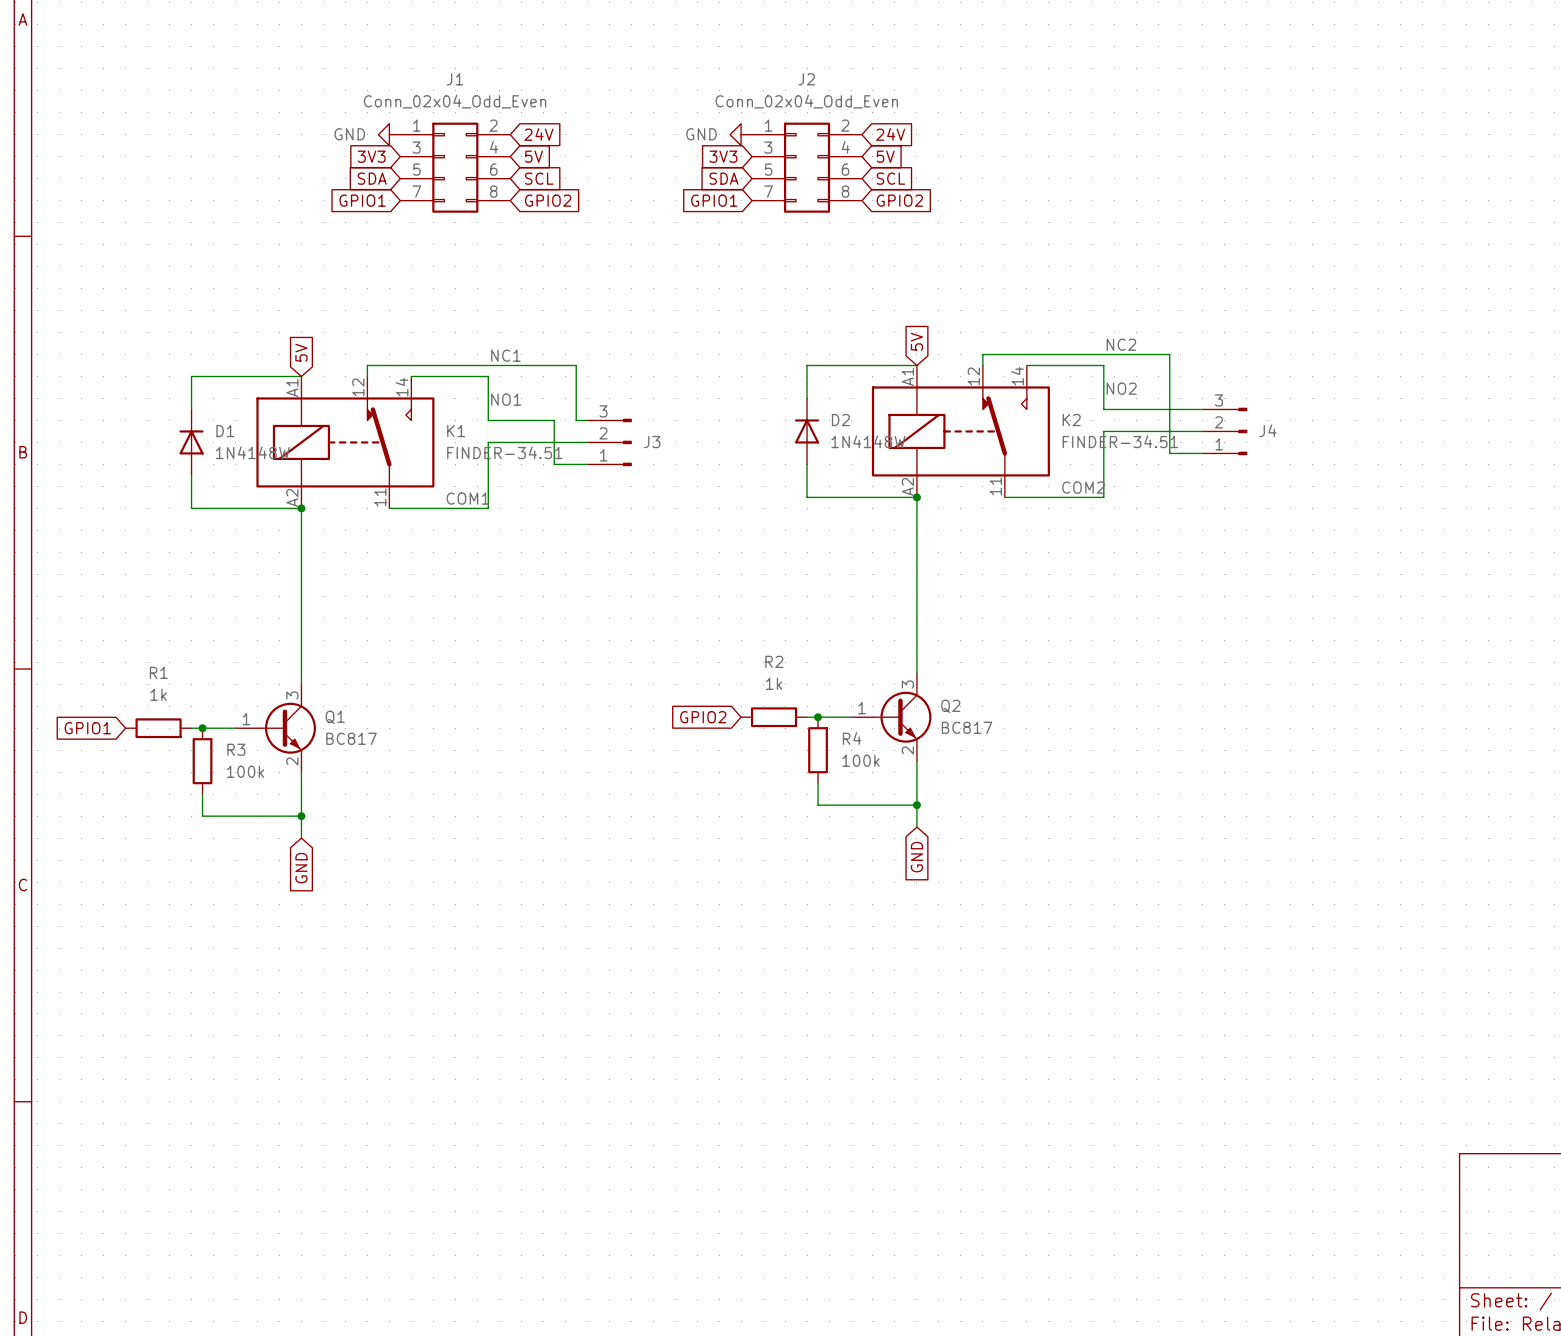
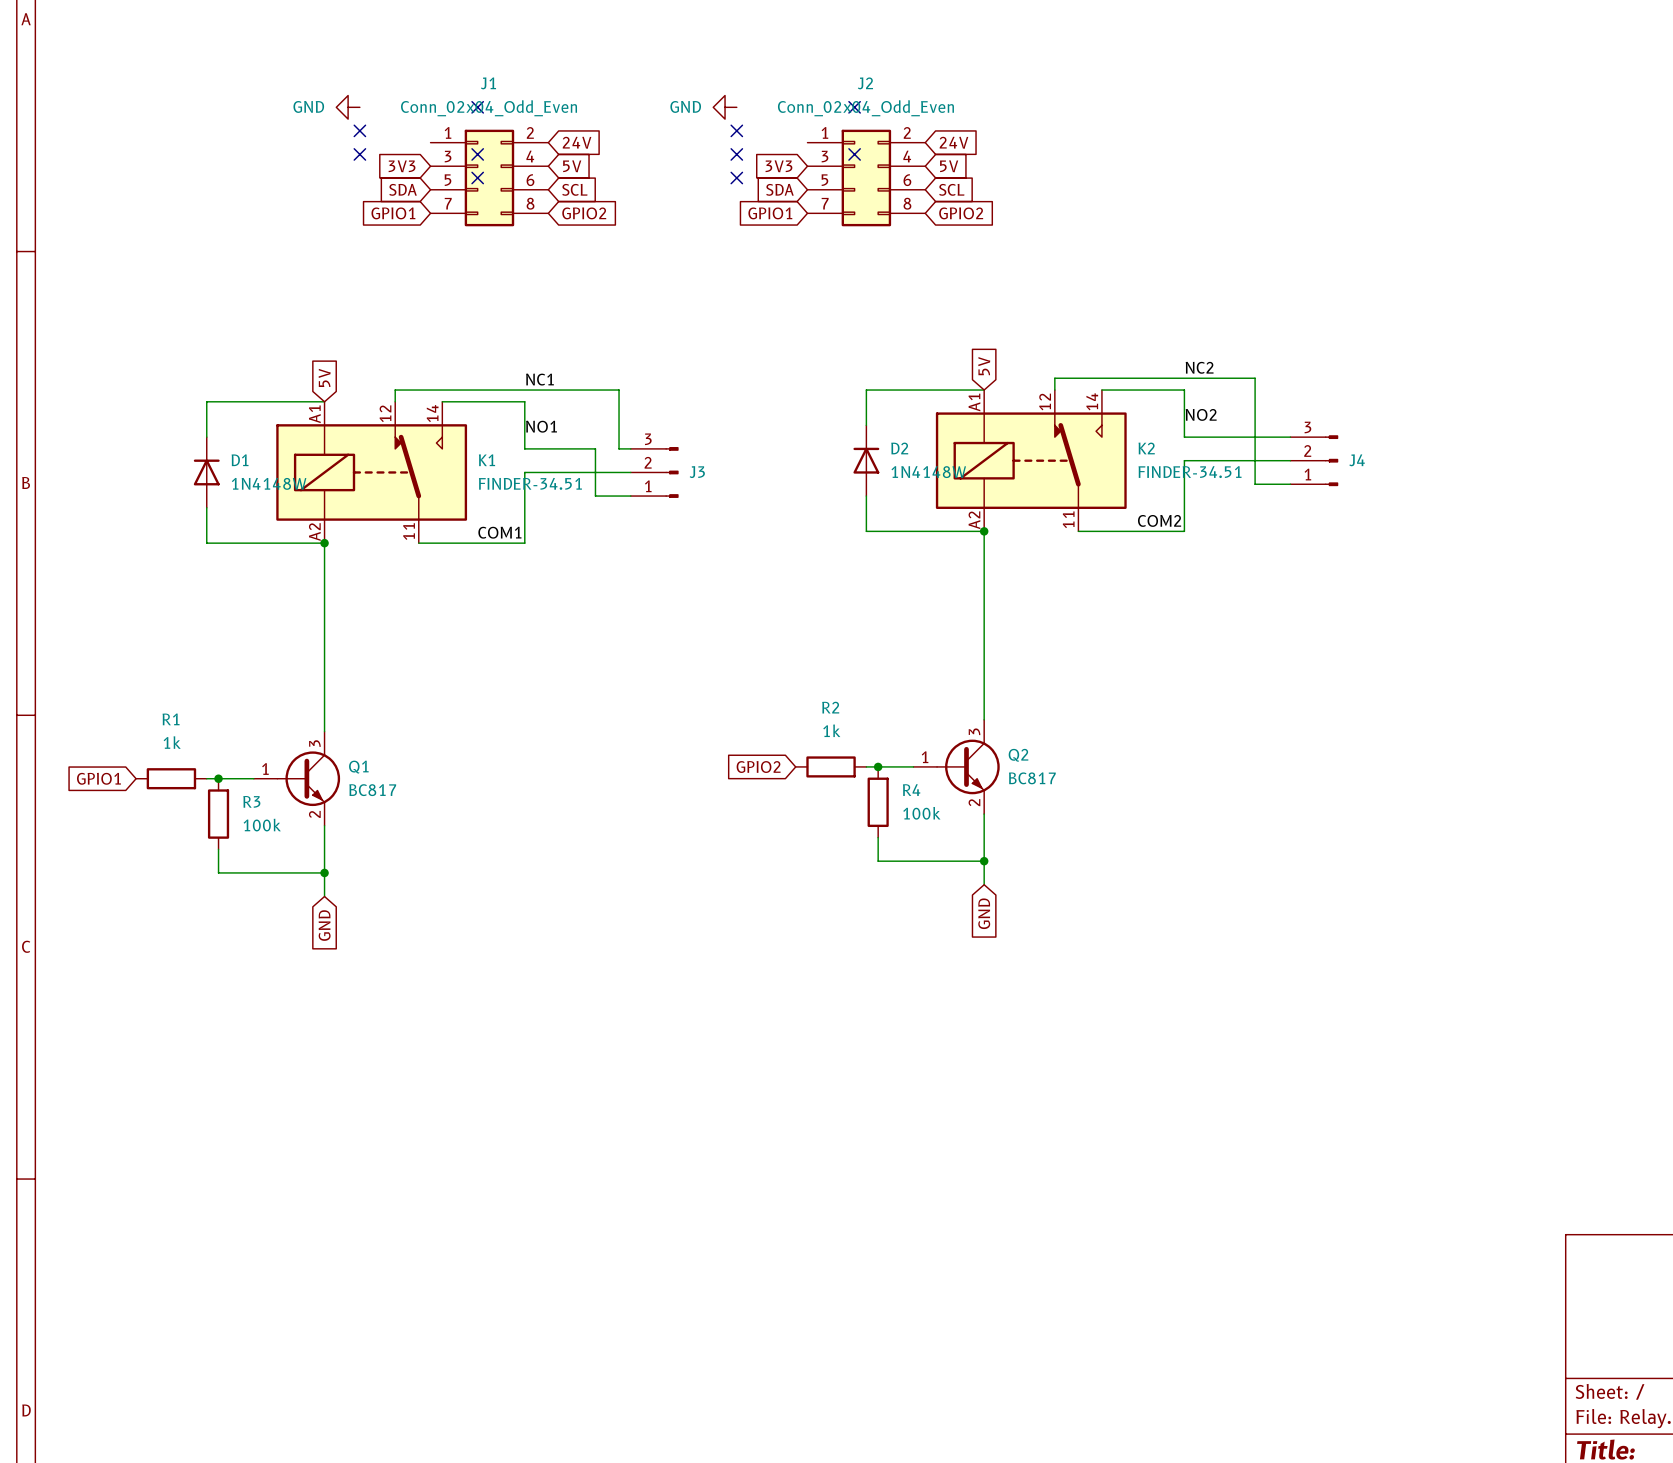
no-connect mark: none -> (477, 107)
no-connect mark: none -> (854, 107)
no-connect mark: none -> (359, 130)
no-connect mark: none -> (736, 130)
power symbol position: GND (389, 134) -> GND (348, 107)
power symbol position: GND (741, 134) -> GND (725, 107)
no-connect mark: none -> (359, 154)
no-connect mark: none -> (477, 154)
no-connect mark: none -> (736, 154)
no-connect mark: none -> (854, 154)
no-connect mark: none -> (477, 178)
no-connect mark: none -> (736, 178)

